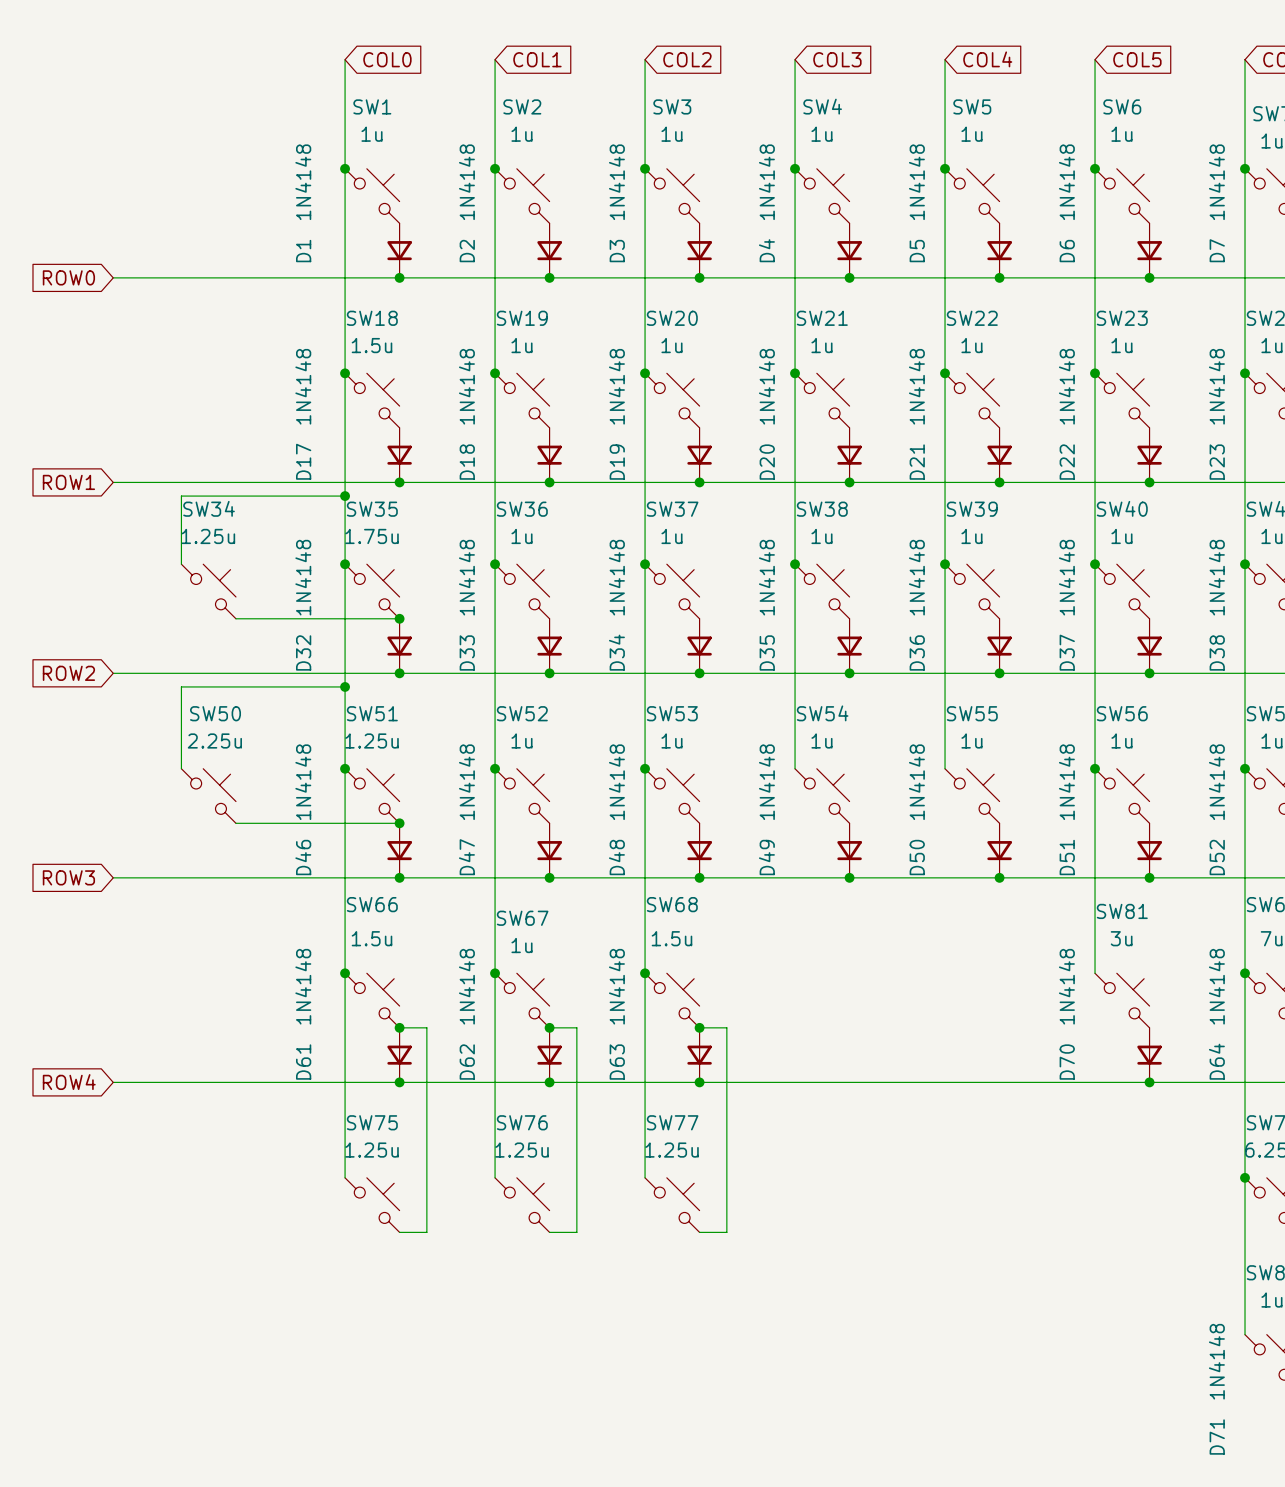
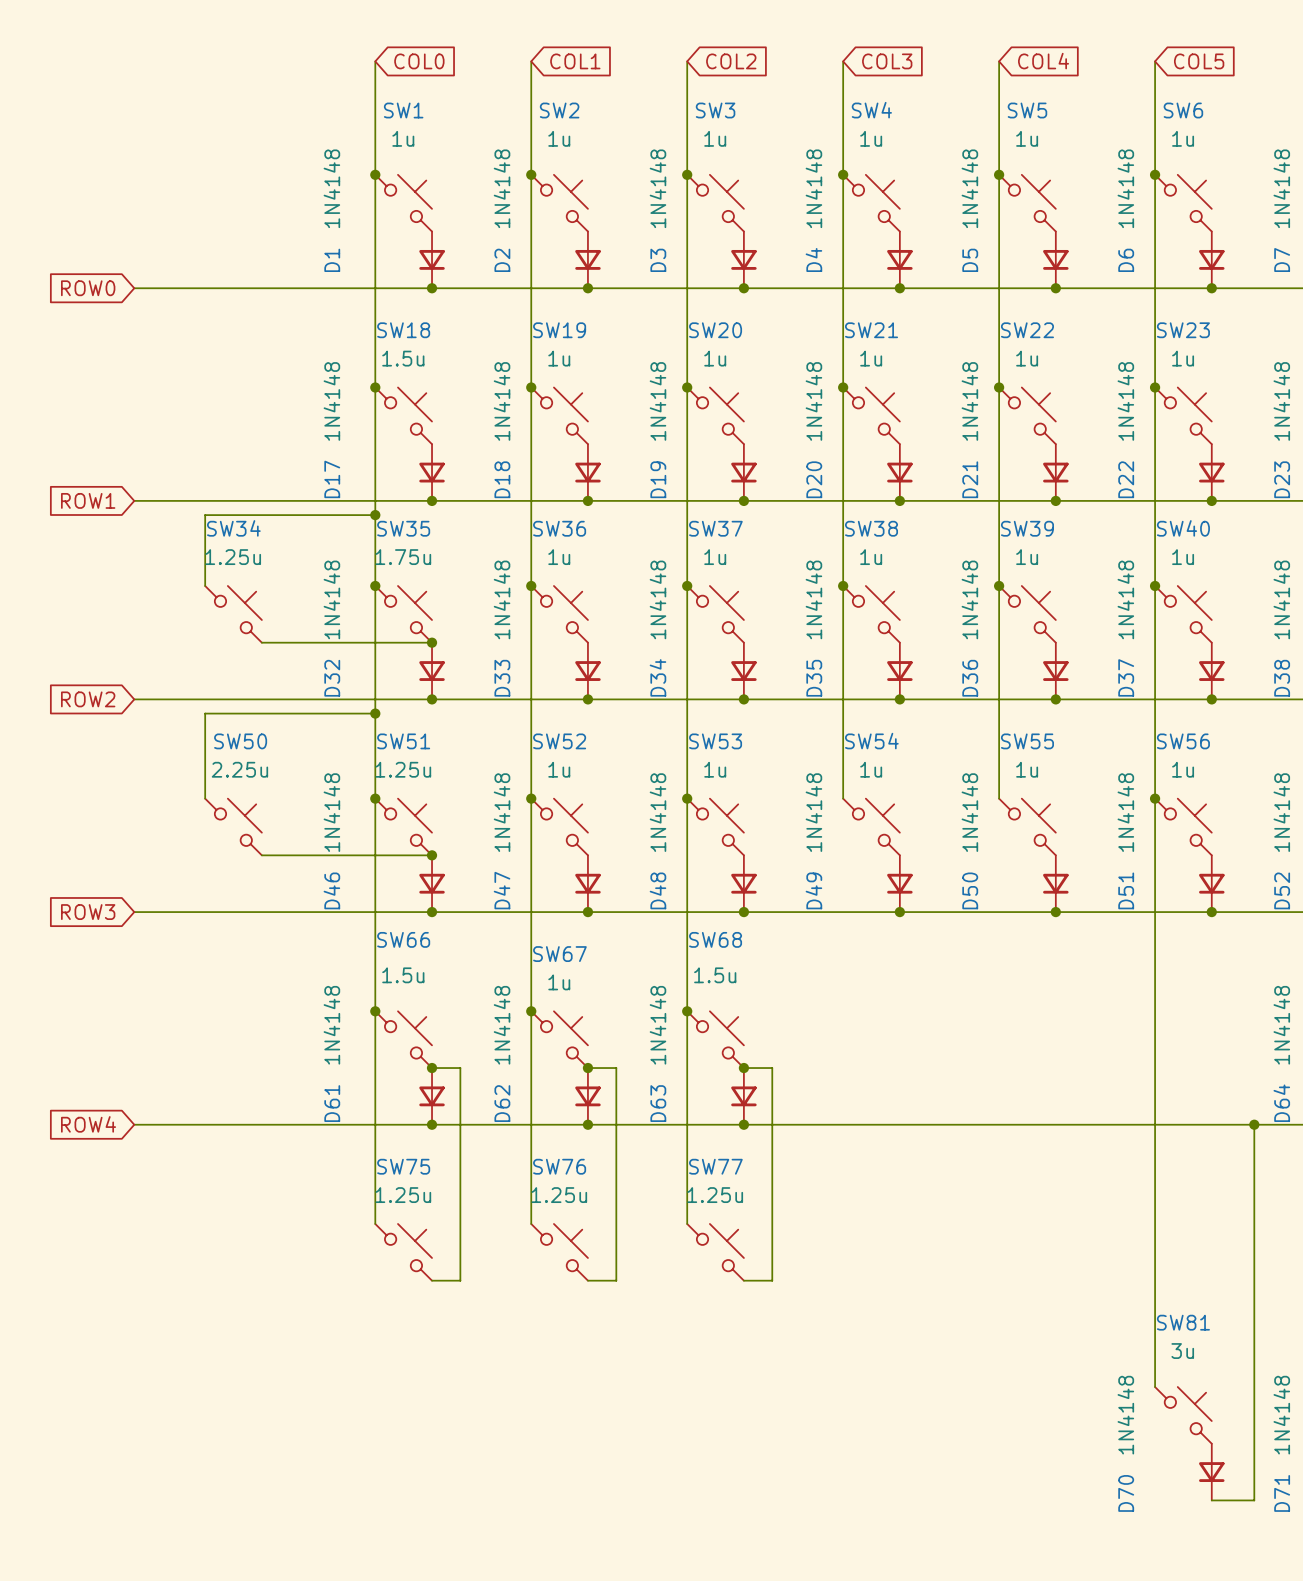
wire: none -> (1155, 1011) (1155, 1387)
D70 value position: 1N4148 (1066, 986) -> 1N4148 (1125, 1415)
SW81 position: (1122, 1000) -> (1183, 1415)
D70 position: (1149, 1055) -> (1211, 1472)
D70 name position: D70 (1067, 1062) -> D70 (1126, 1493)
junction position: (1149, 1082) -> (1254, 1124)
wire: none -> (1254, 1124) (1254, 1500) (1211, 1500)

